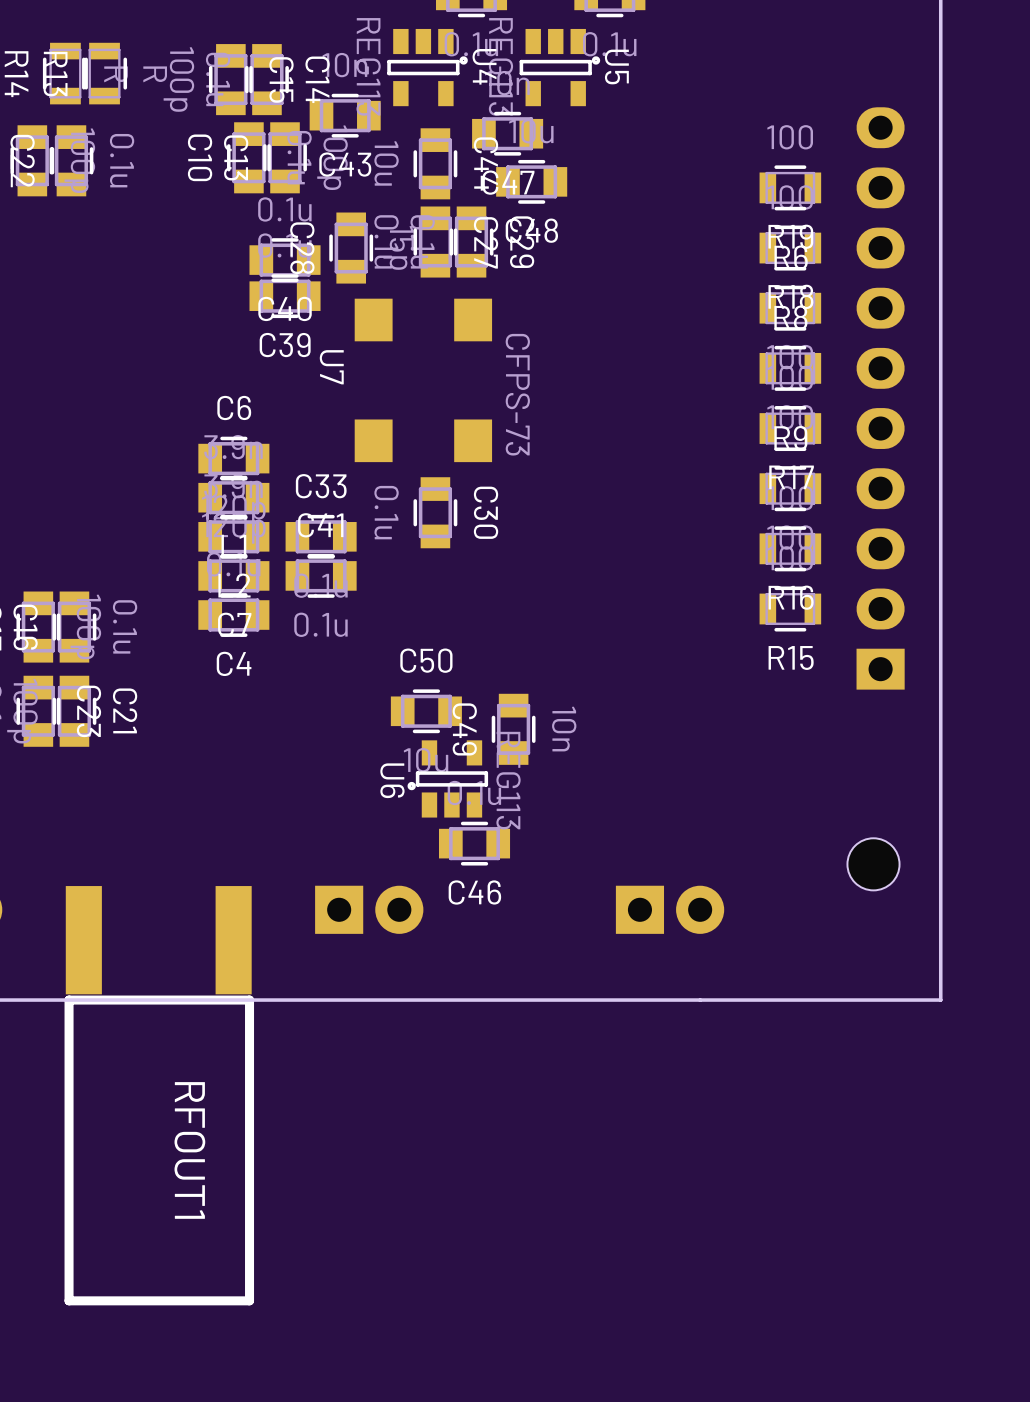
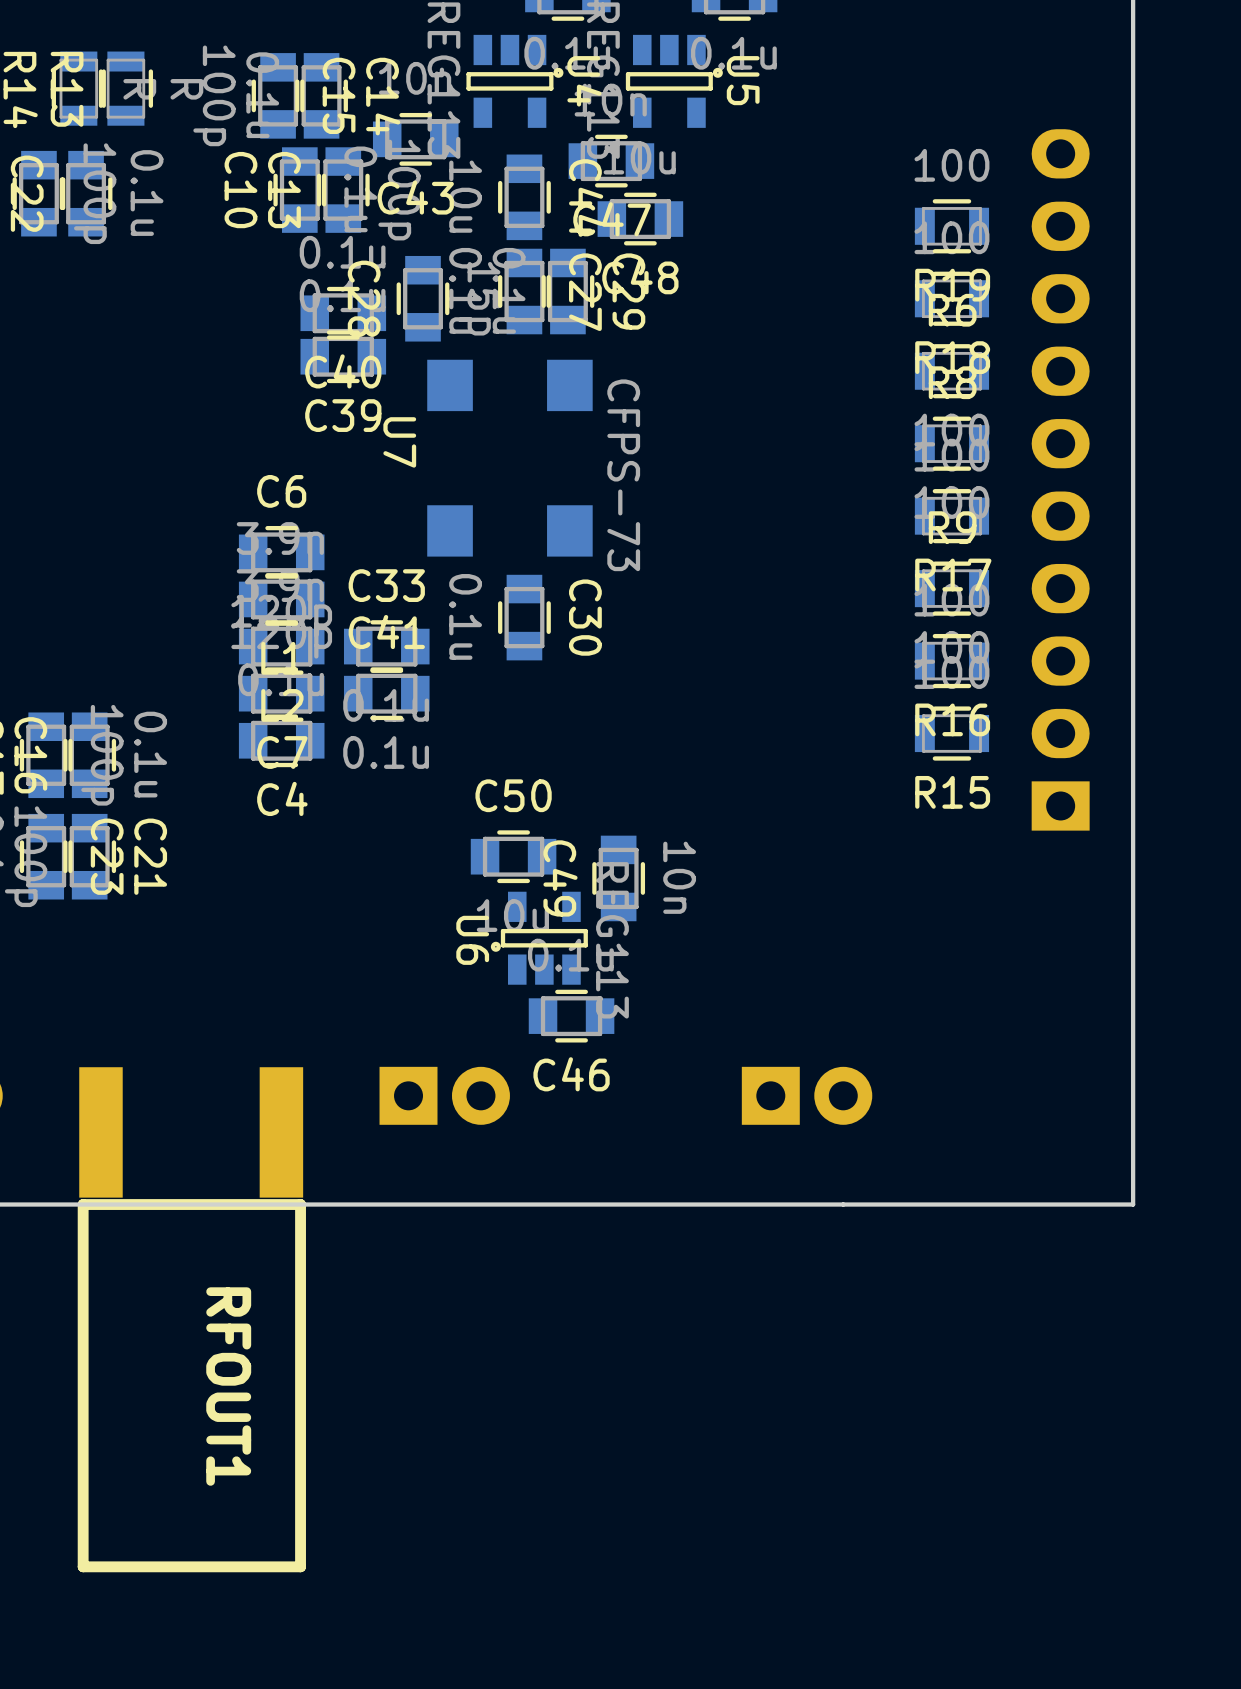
part: (873, 864) -> none

